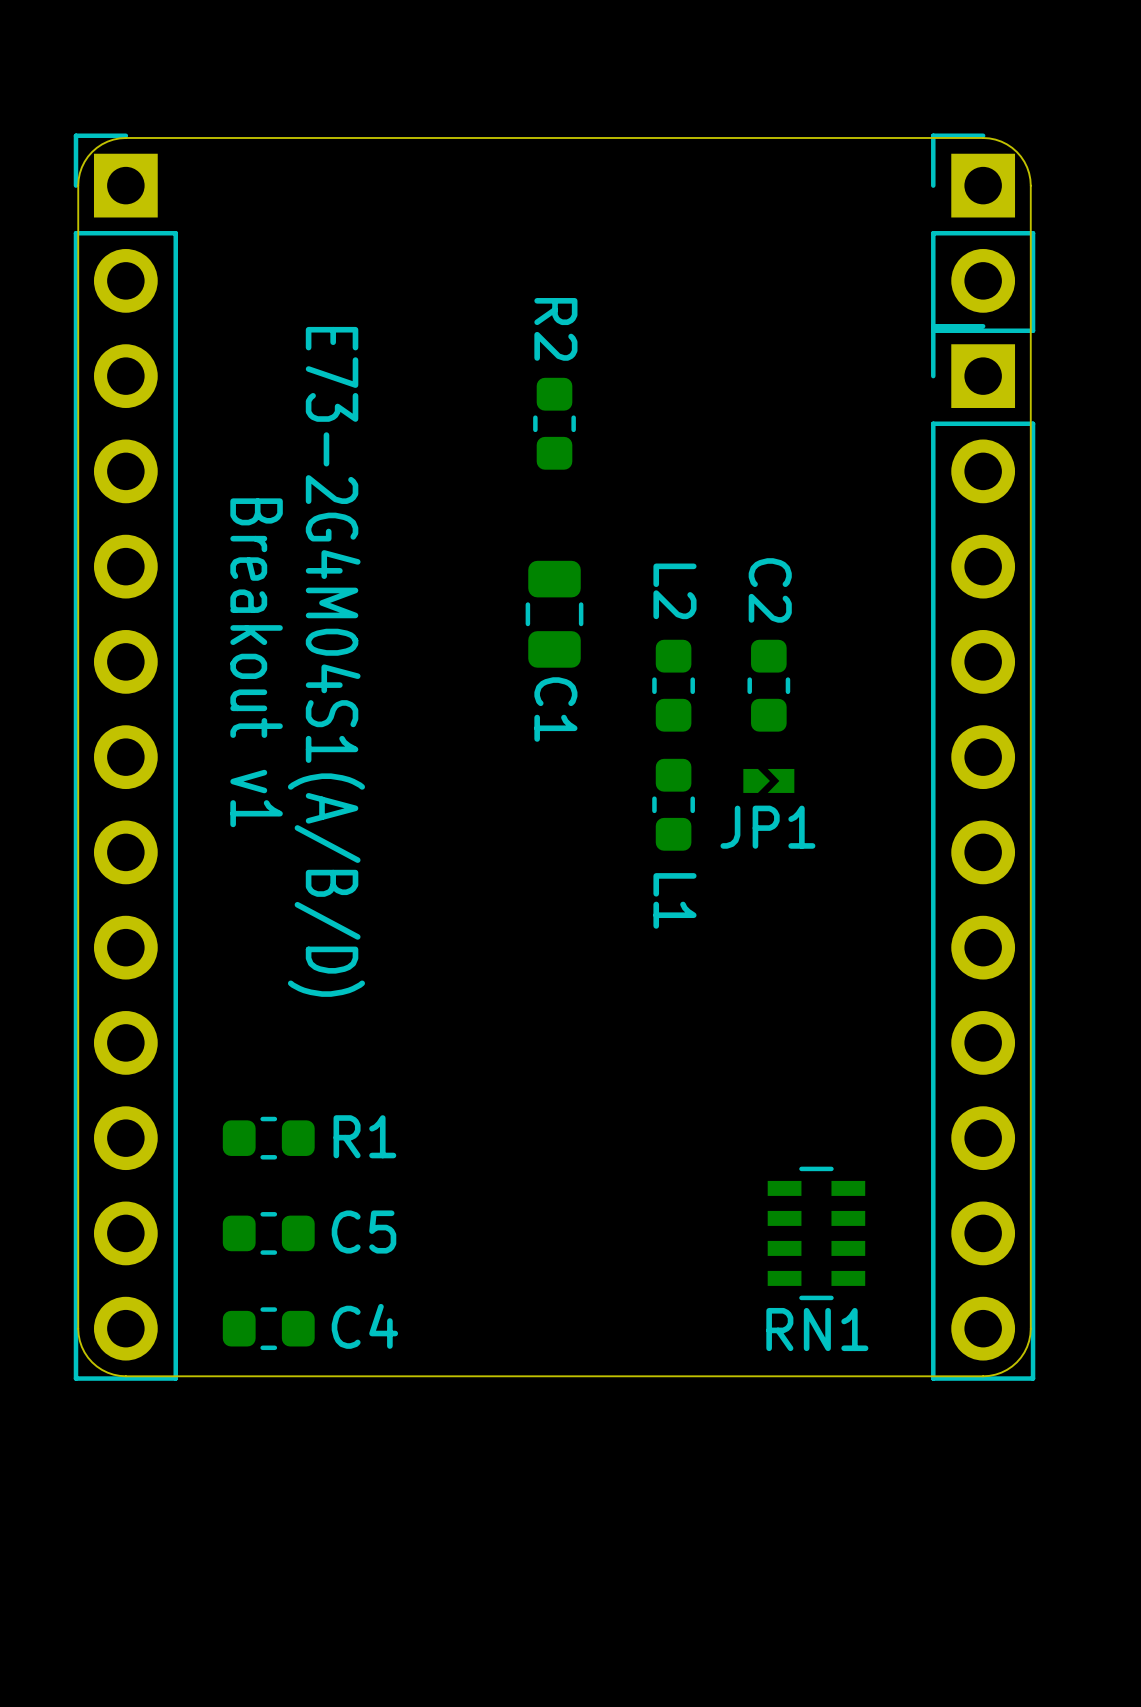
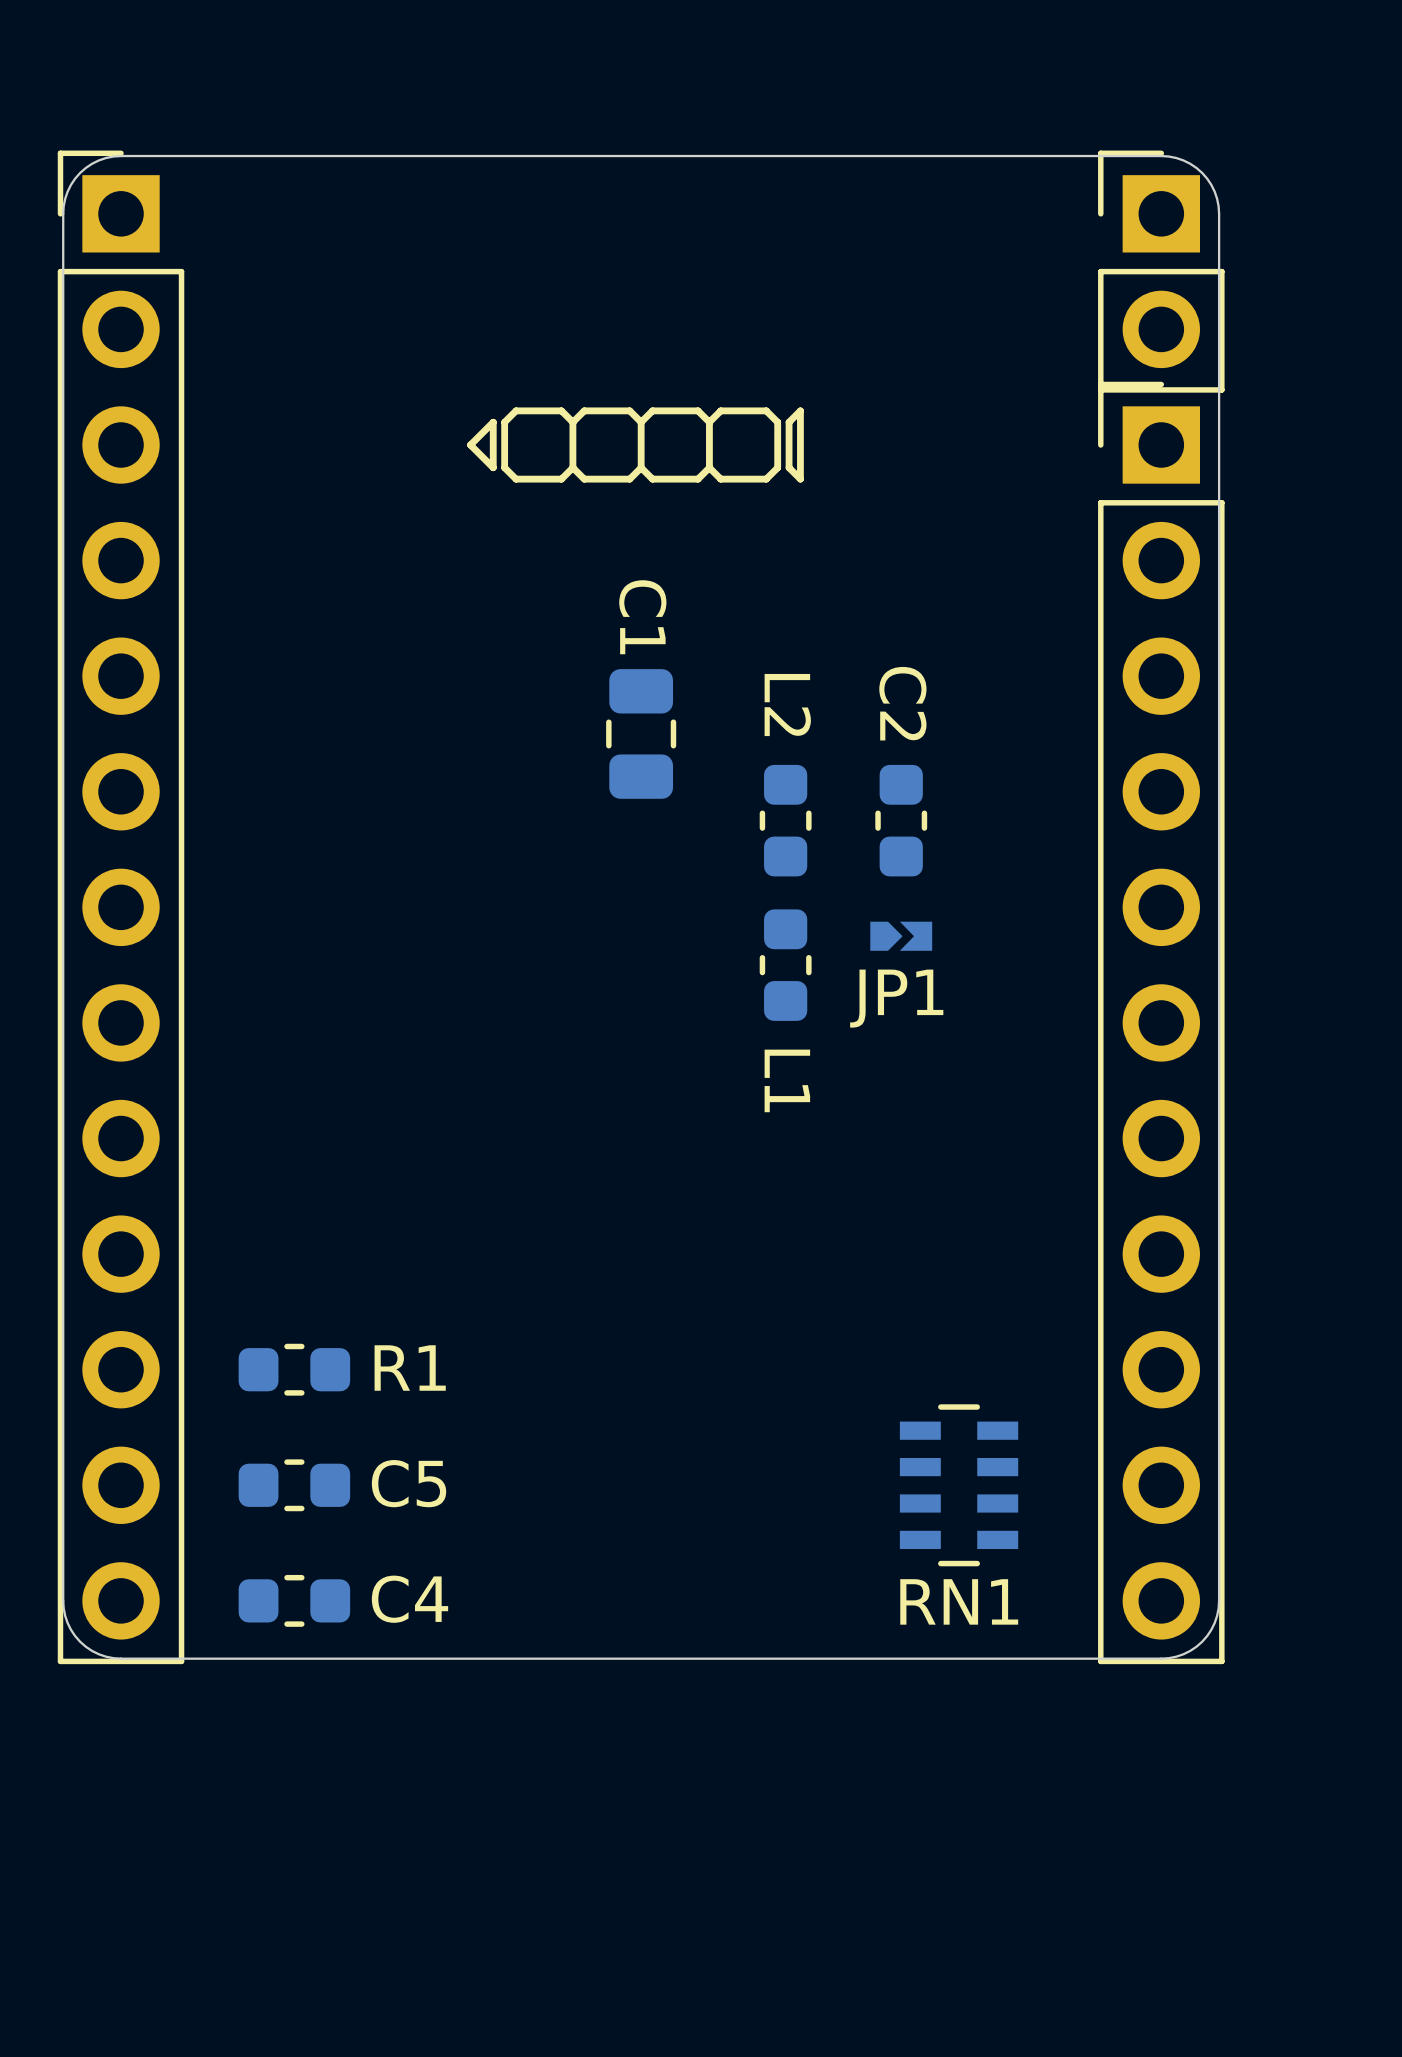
drawing: none -> [467, 407, 804, 483]
R2: (554, 423) -> none
text: E73-2G4M04S1(A/B/D) (326, 661) -> none
text: Breakout v1 (256, 662) -> none
C1 name position: C1 (555, 709) -> C1 (642, 617)

